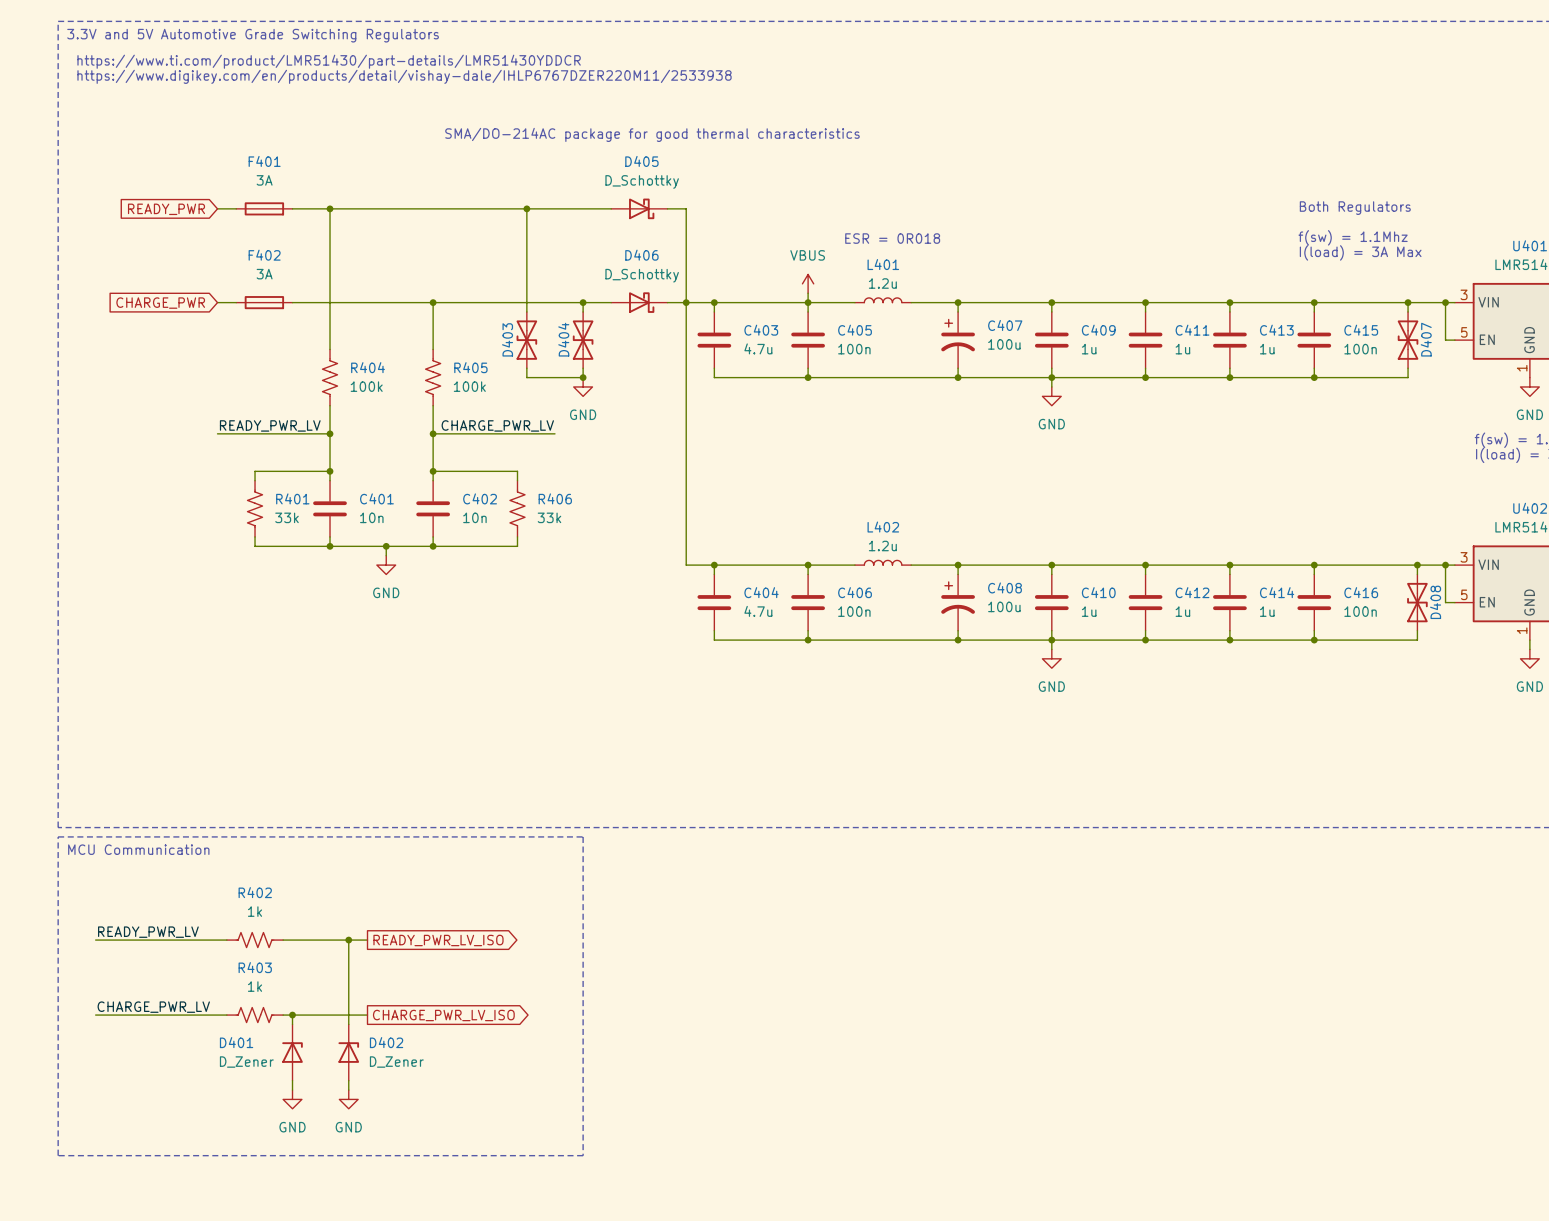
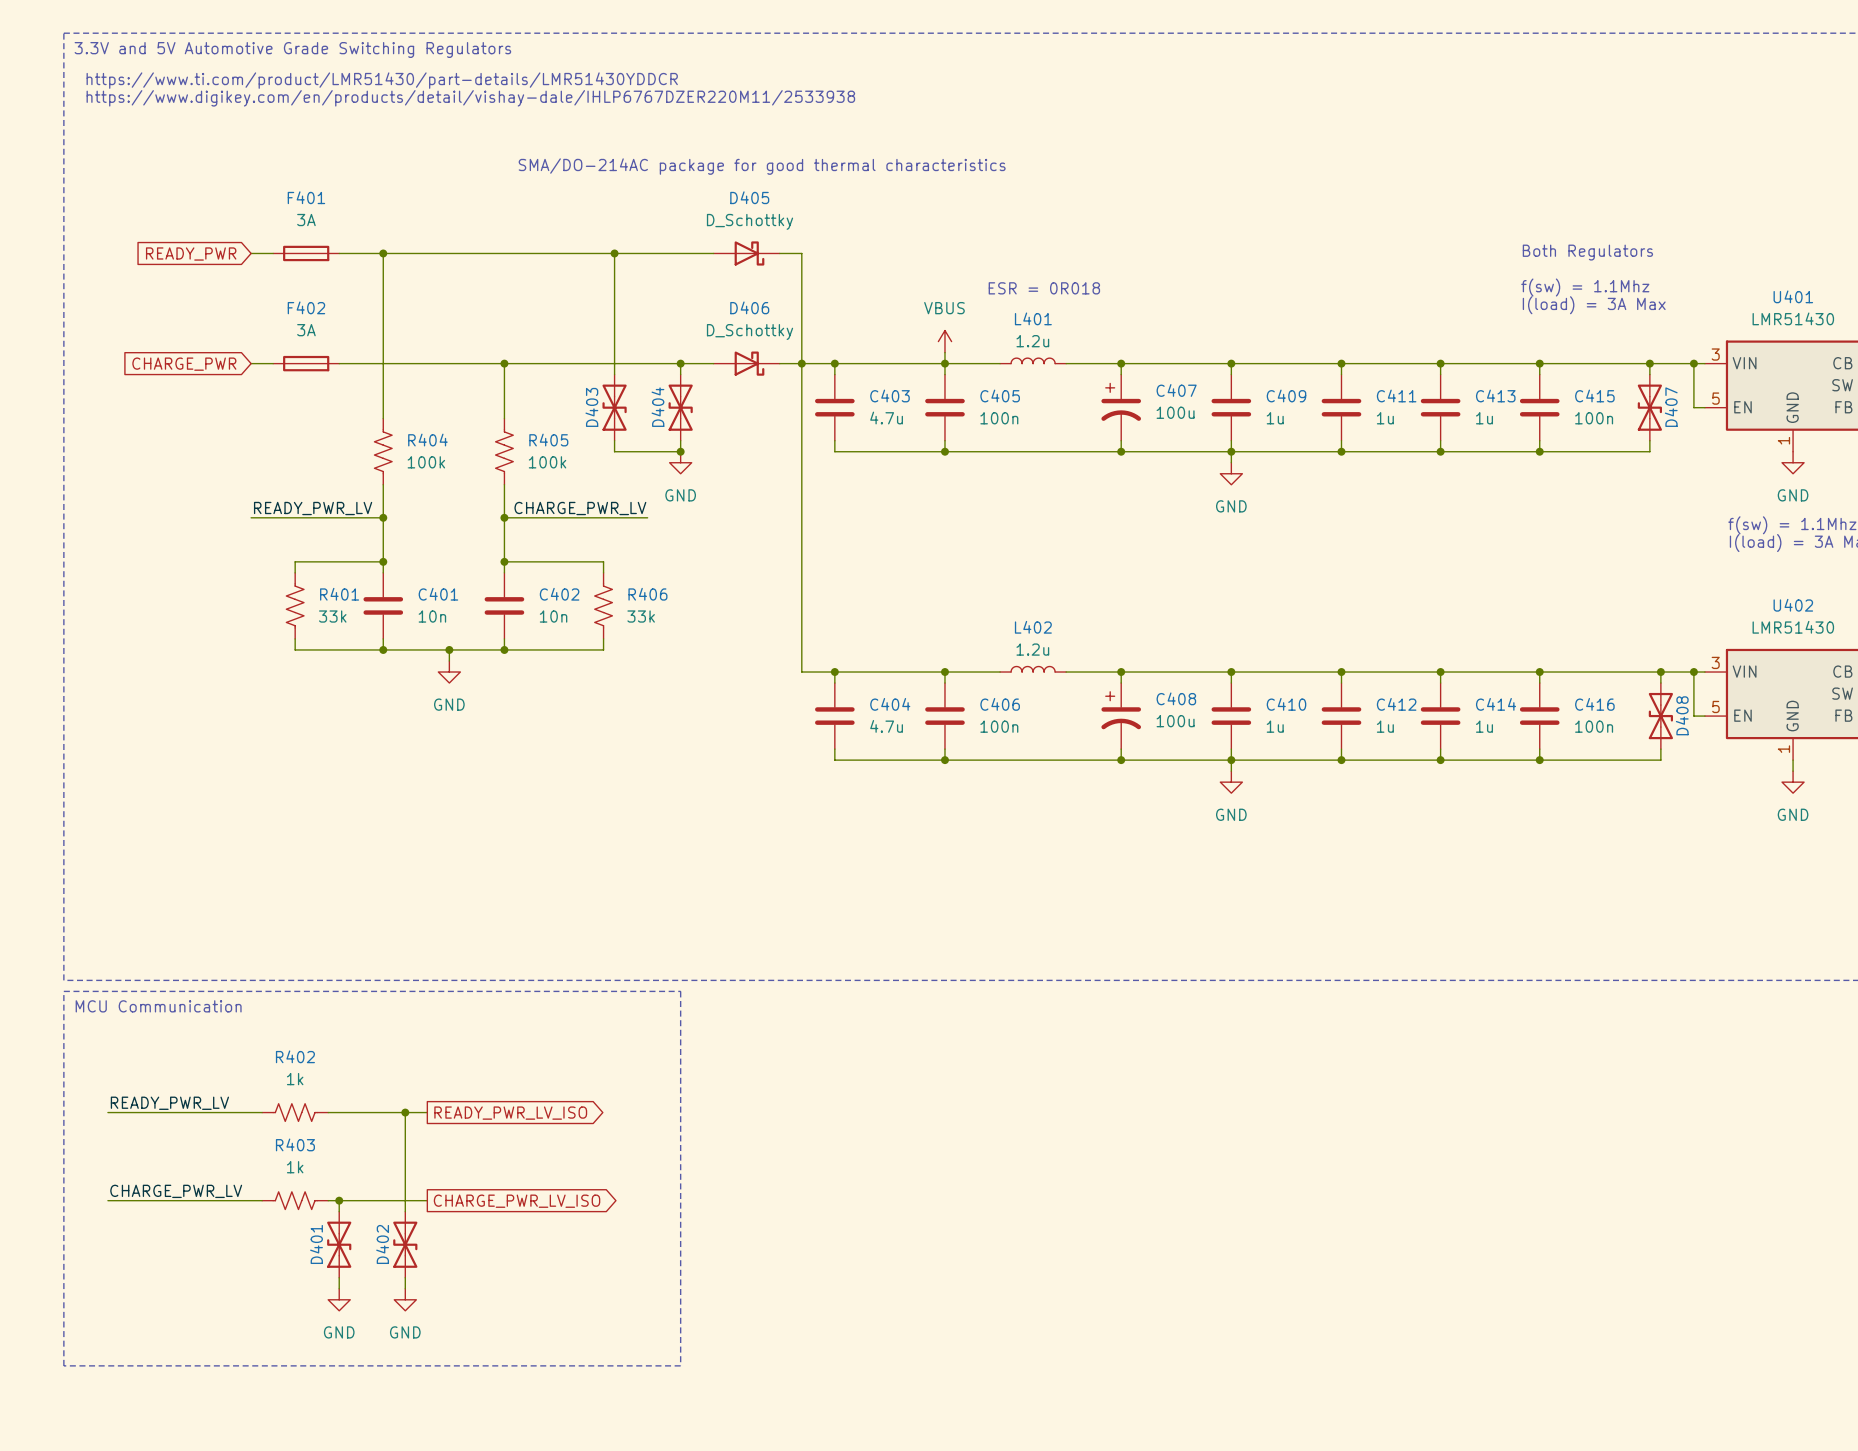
D401 symbol: [282, 1024, 303, 1081] -> [327, 1211, 352, 1278]
D402 symbol: [338, 1024, 360, 1081] -> [393, 1211, 418, 1278]
D401 name position: D401 (236, 1042) -> D401 (316, 1244)
D402 name position: D402 (386, 1042) -> D402 (382, 1244)
D401 value: D_Zener (246, 1062) -> none
D402 value: D_Zener (396, 1062) -> none

